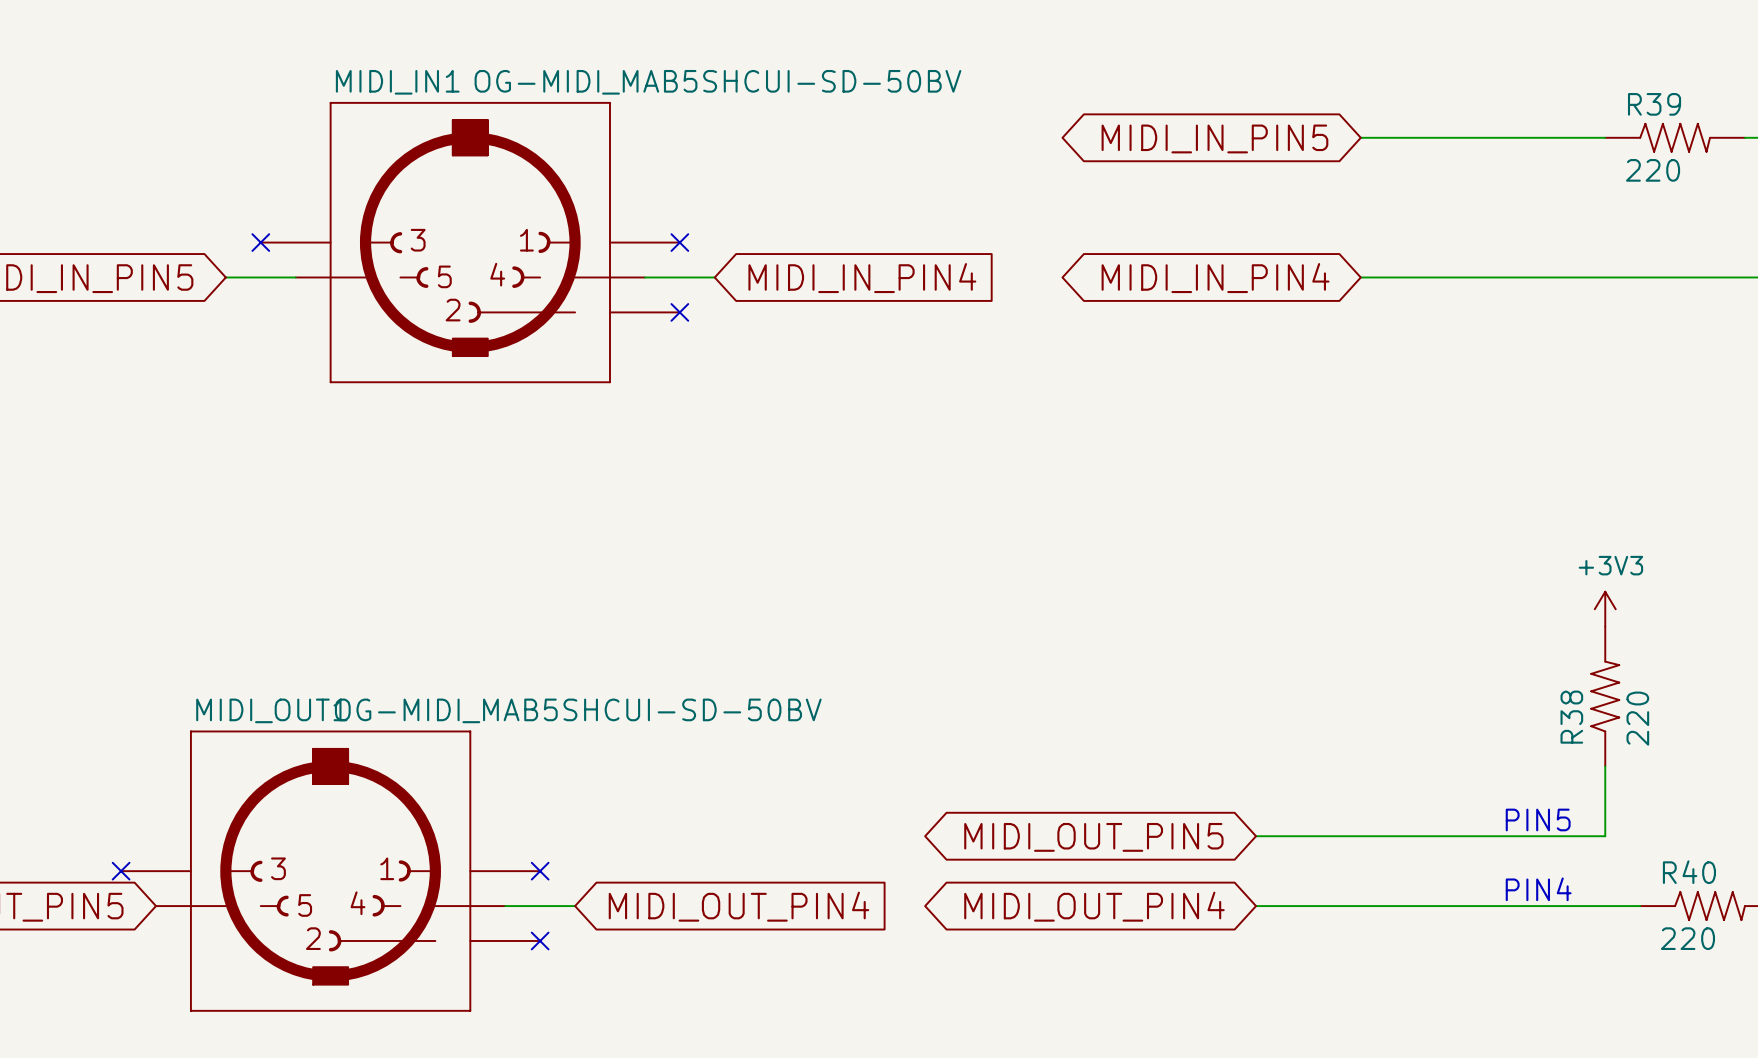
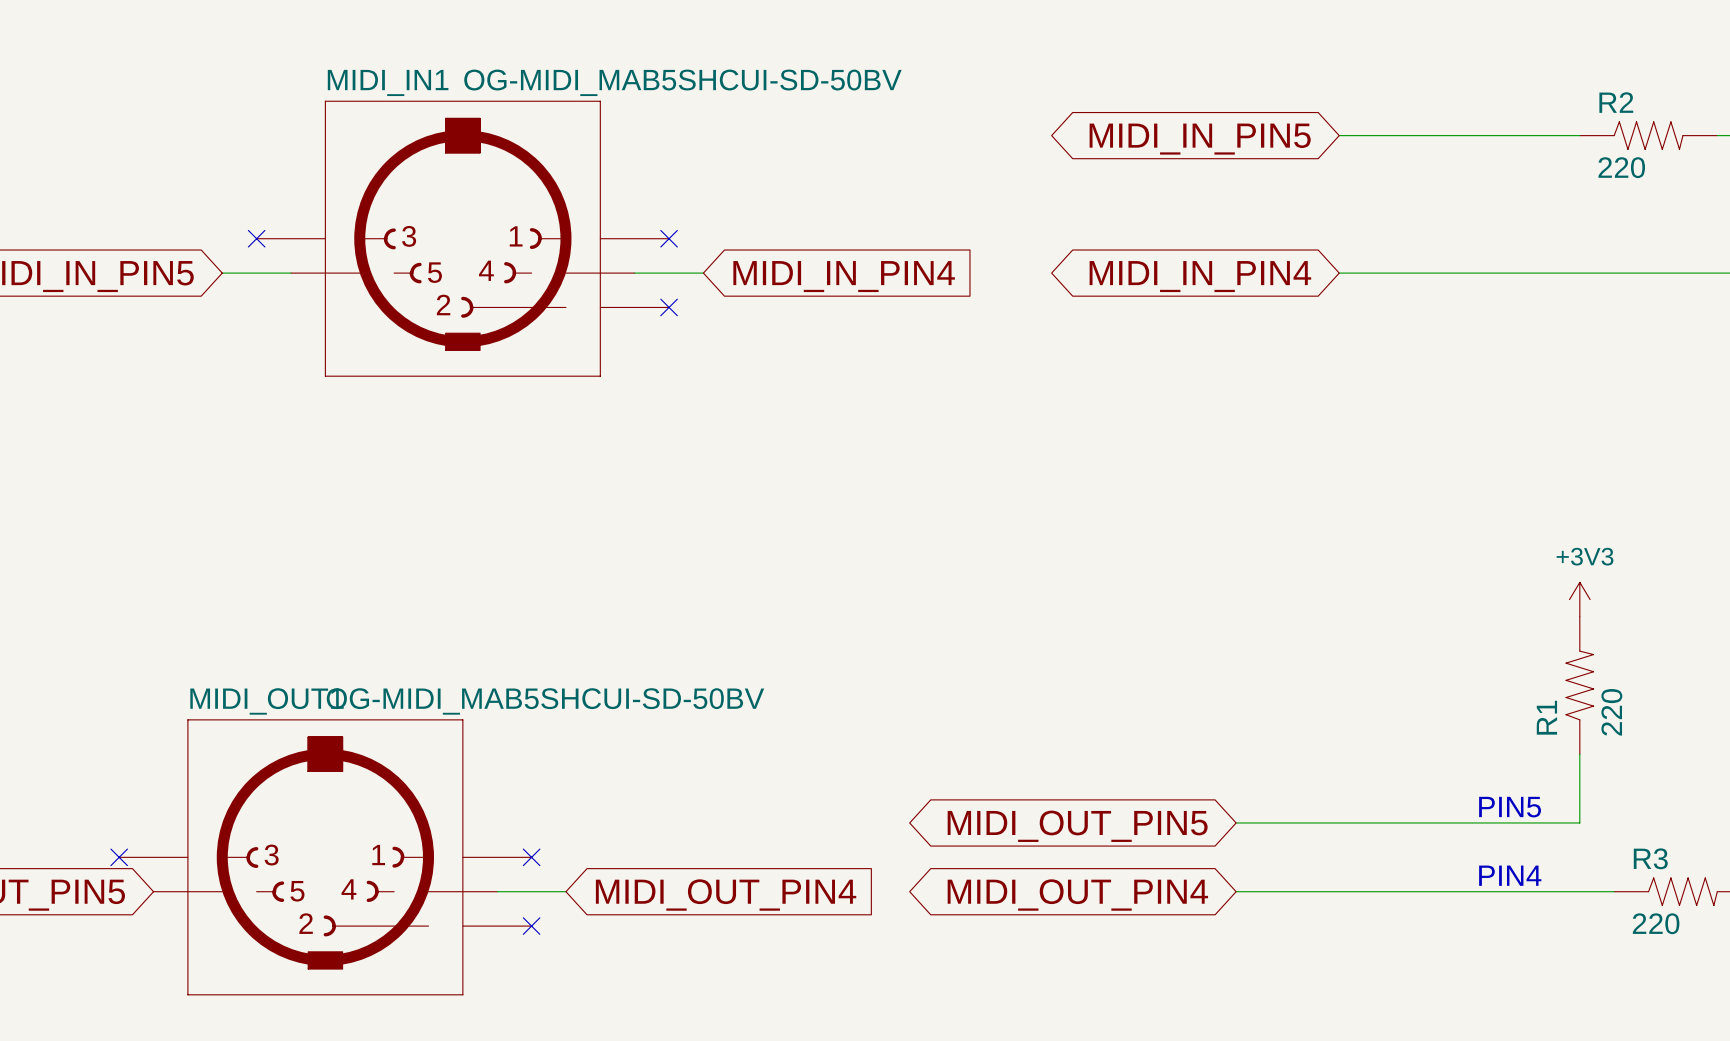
R39 name: R39 (1654, 104) -> R2 (1616, 102)
R38 name: R38 (1571, 717) -> R1 (1546, 717)
R40 name: R40 (1689, 872) -> R3 (1650, 858)

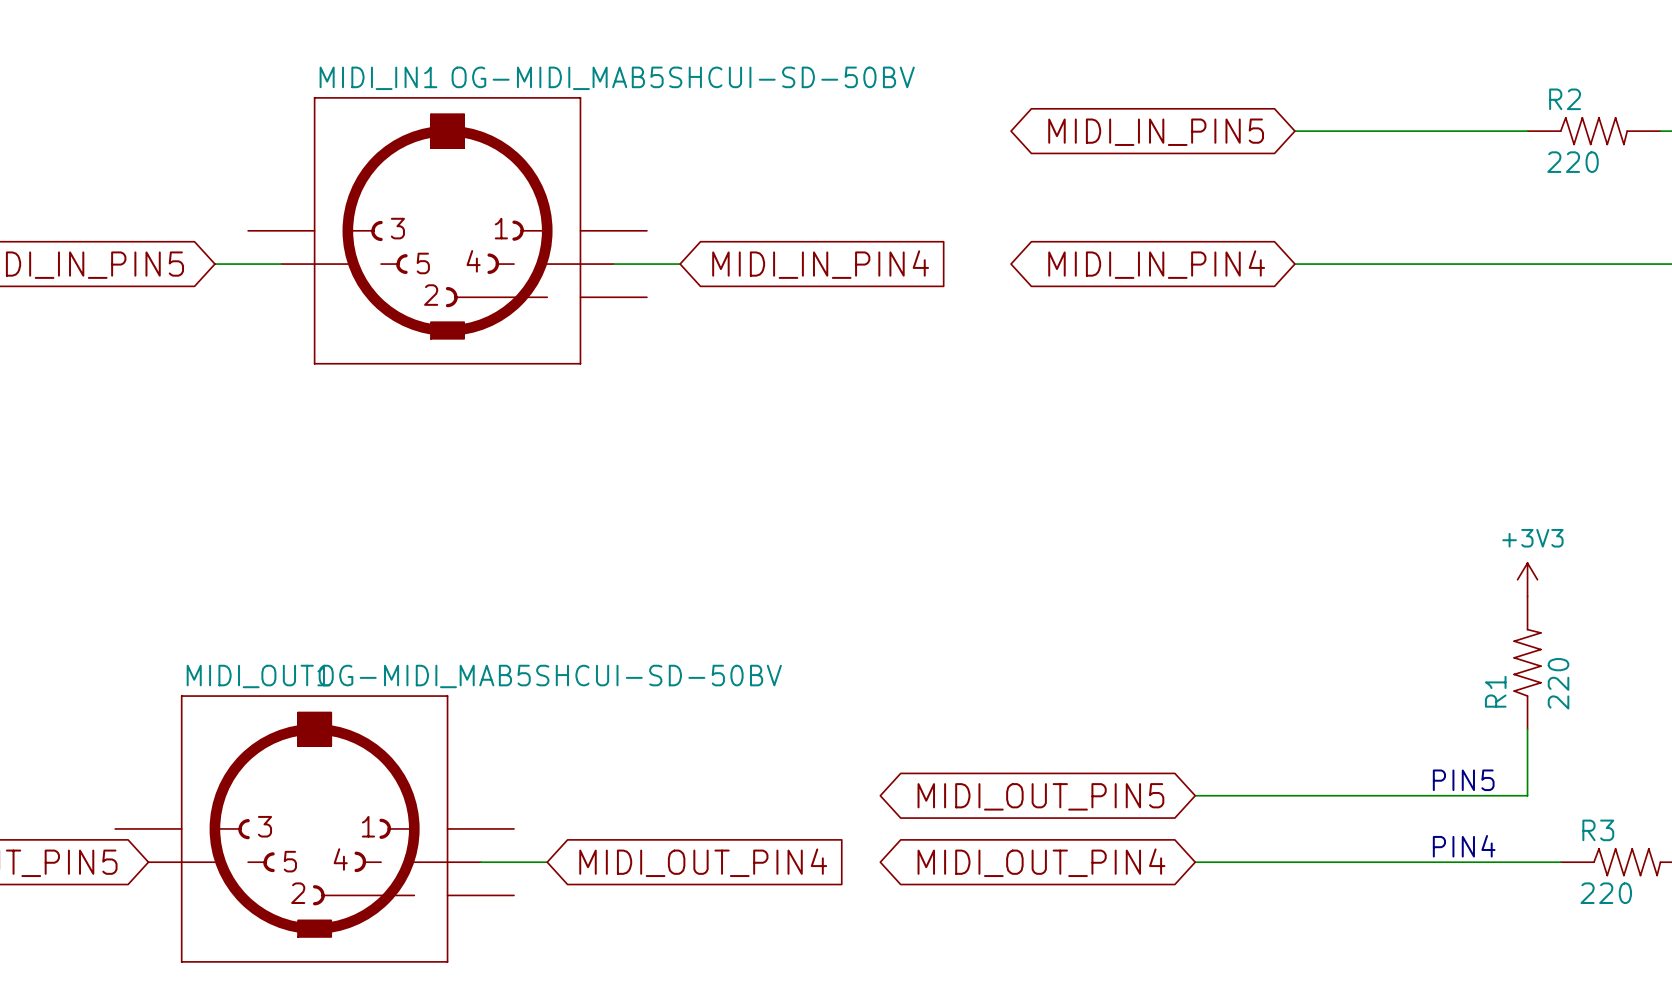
no-connect mark: (256, 238) -> none
no-connect mark: (669, 238) -> none
no-connect mark: (669, 307) -> none
no-connect mark: (119, 857) -> none
no-connect mark: (531, 857) -> none
no-connect mark: (531, 926) -> none

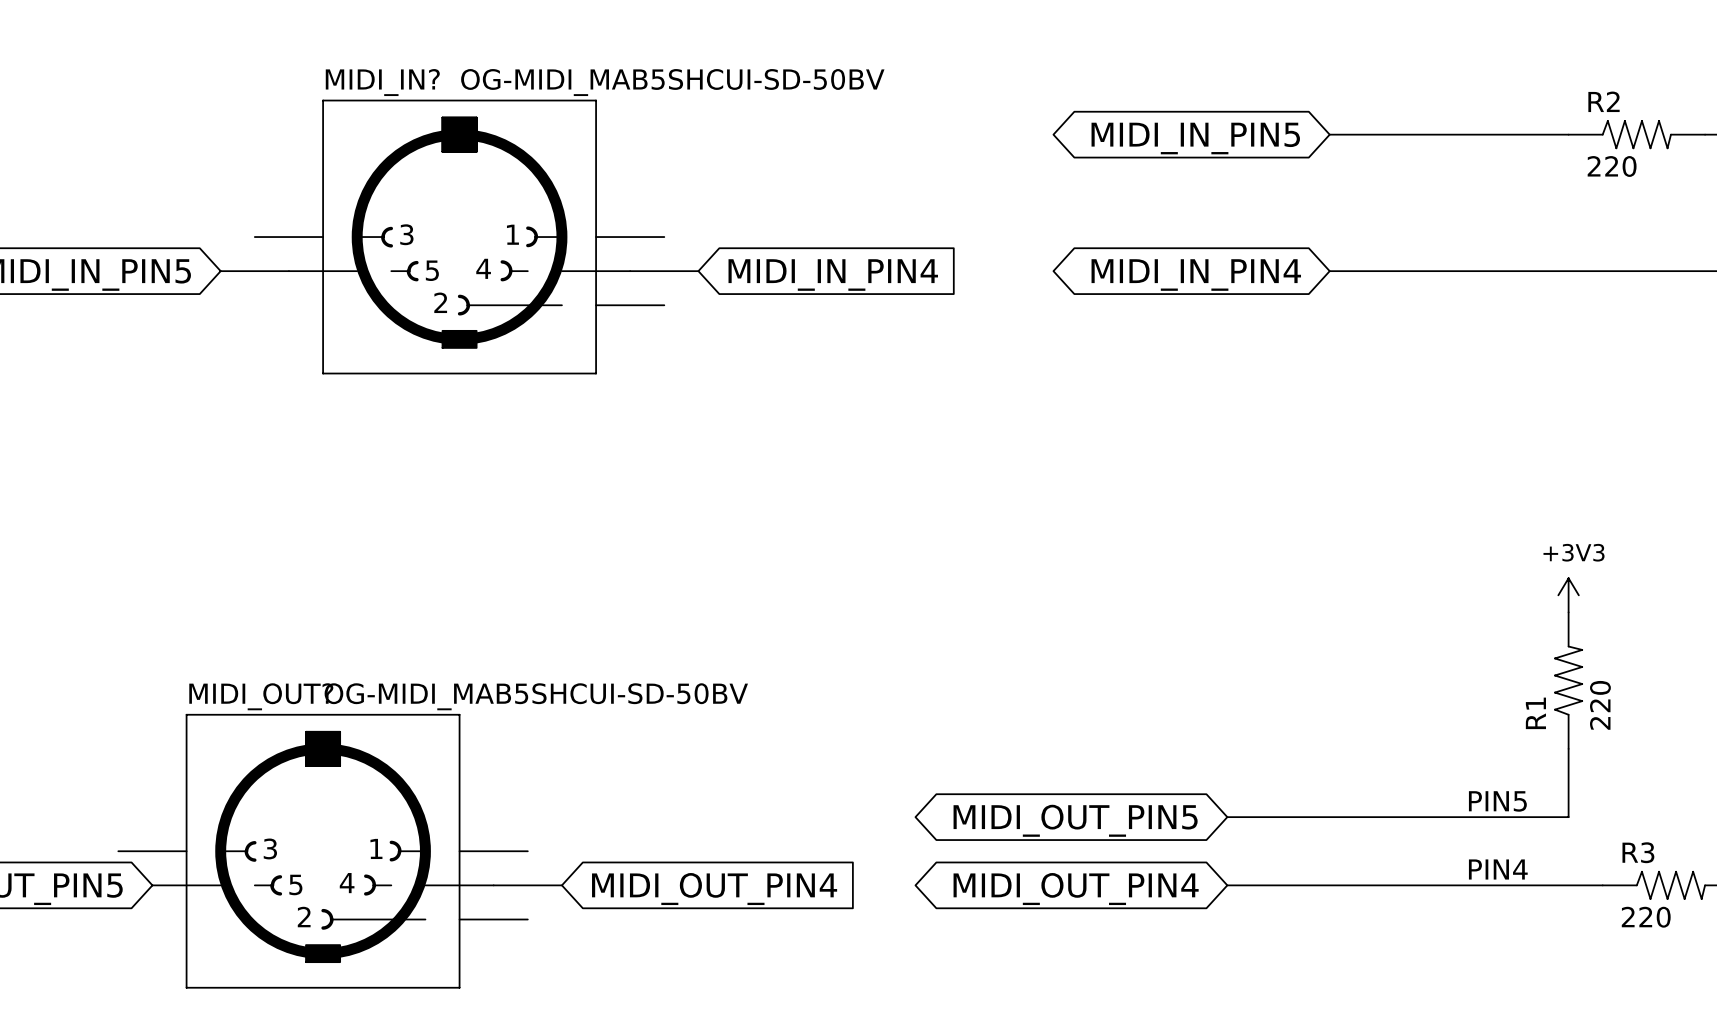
MIDI_IN1 name: MIDI_IN1 (378, 78) -> MIDI_IN? (382, 82)
MIDI_OUT1 name: MIDI_OUT1 (258, 676) -> MIDI_OUT? (261, 696)

